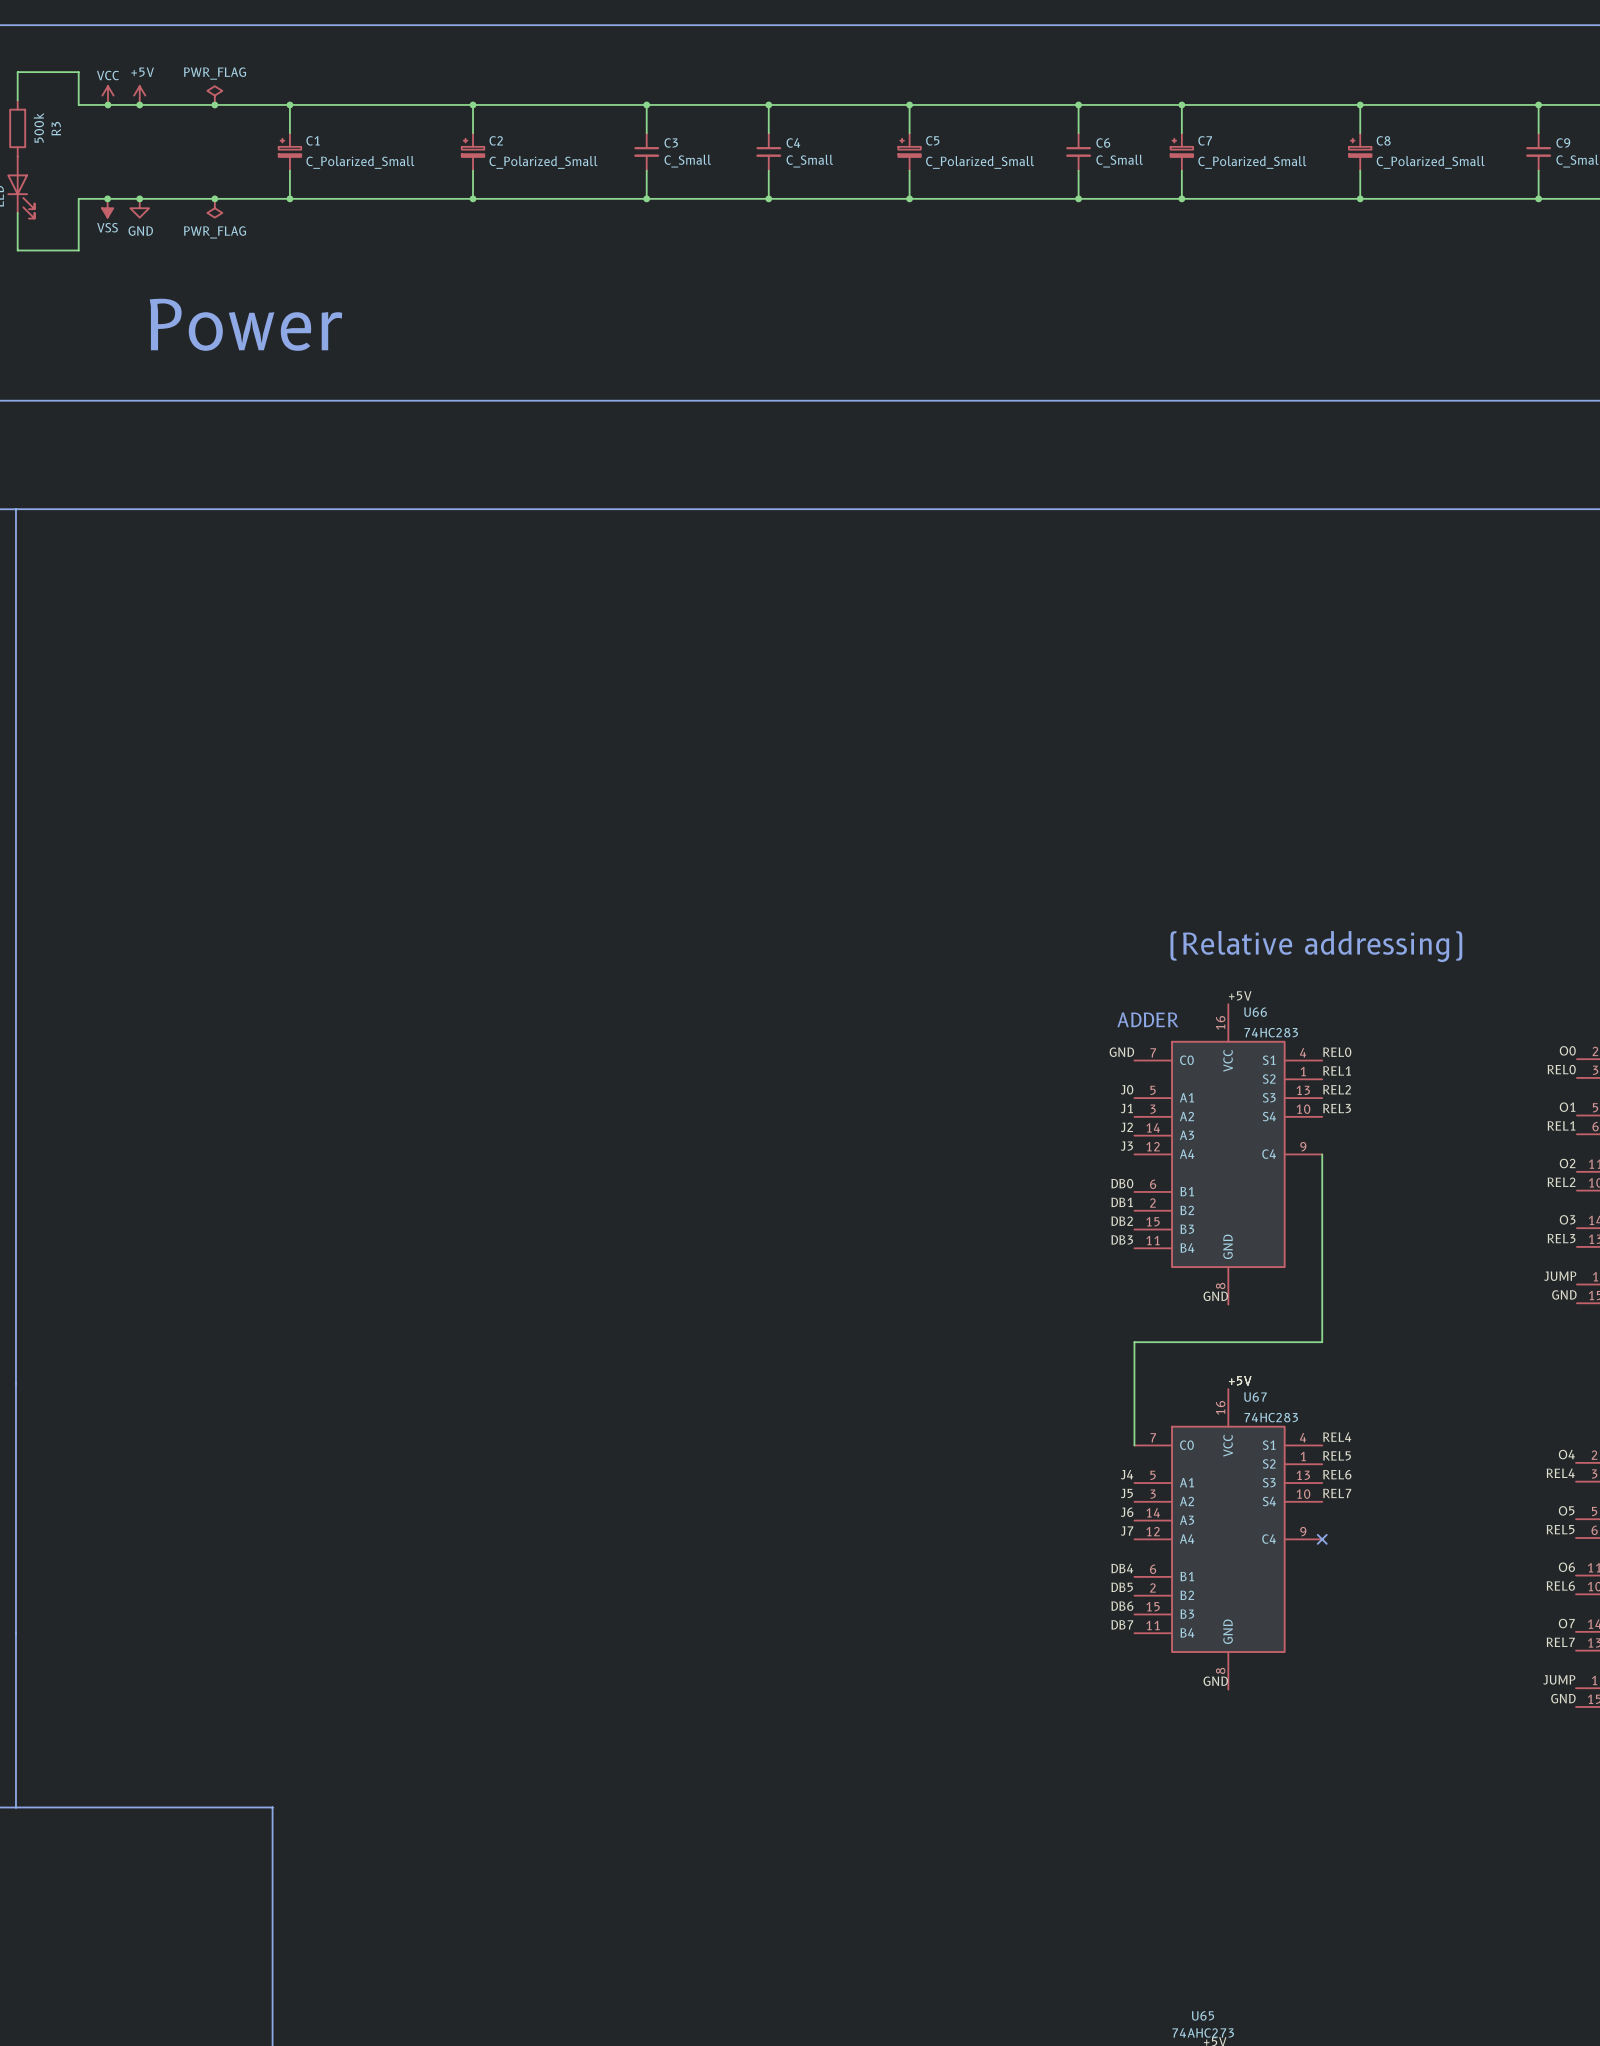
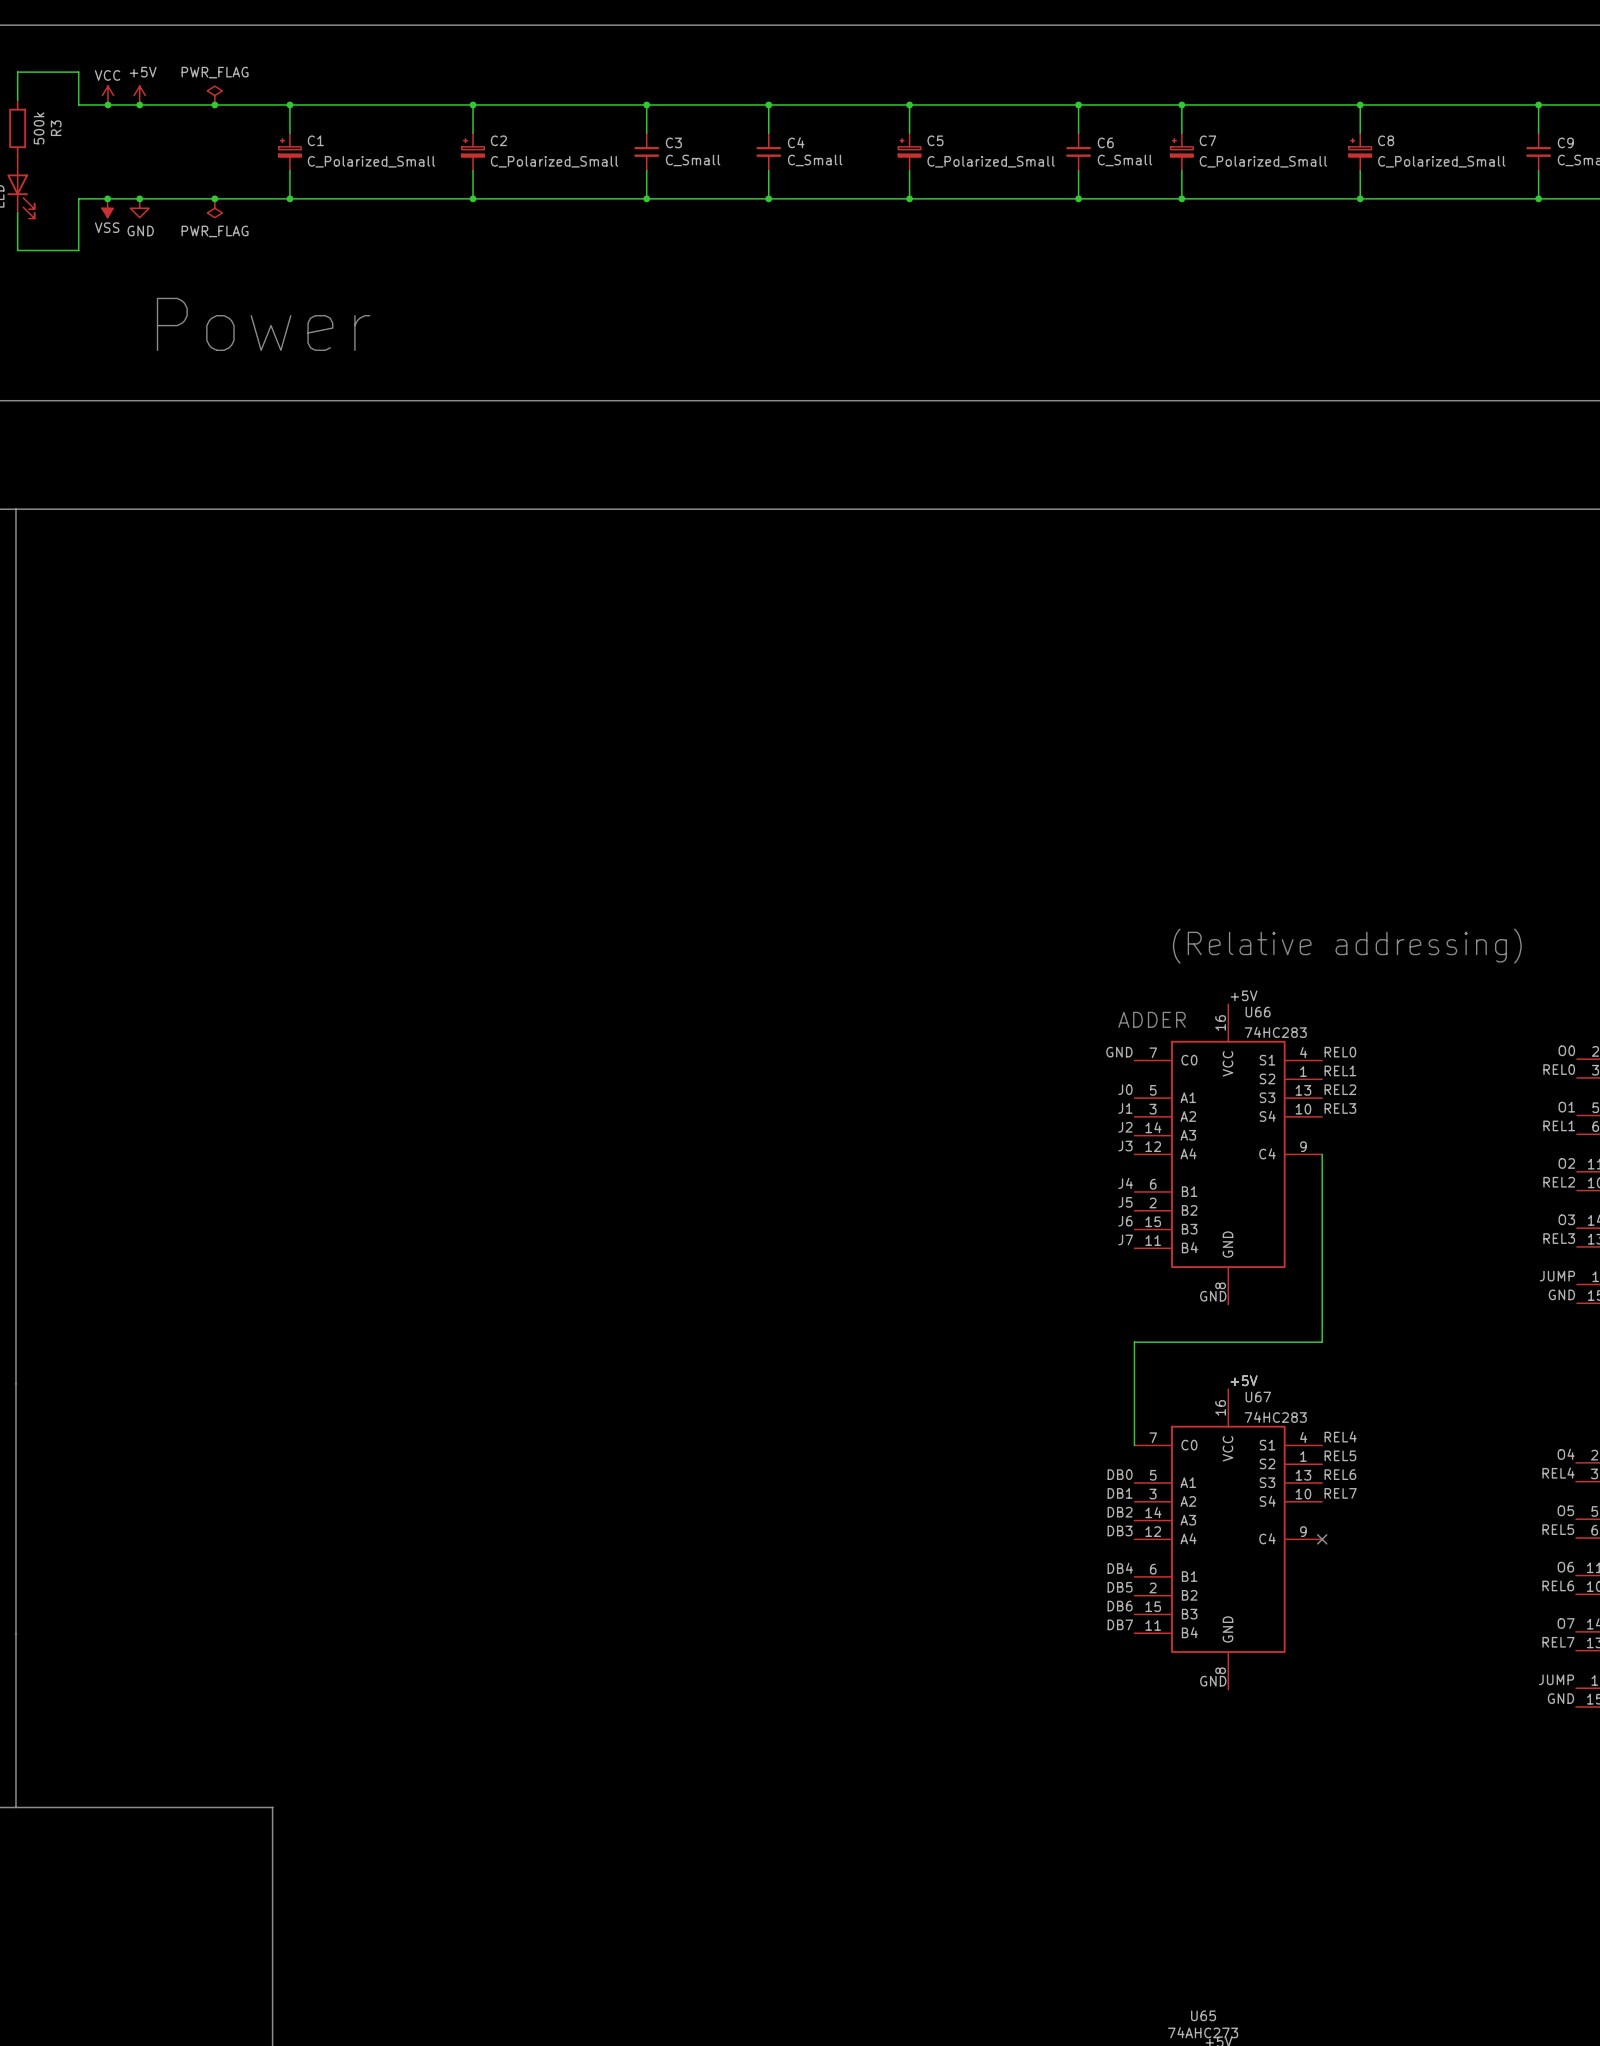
label: DB0 (1122, 1183) -> J4 (1125, 1183)
label: DB1 (1122, 1202) -> J5 (1125, 1202)
label: DB2 (1122, 1221) -> J6 (1125, 1221)
label: DB3 (1122, 1239) -> J7 (1125, 1239)
label: J4 (1127, 1474) -> DB0 (1120, 1474)
label: J5 (1126, 1493) -> DB1 (1120, 1493)
label: J6 (1127, 1512) -> DB2 (1120, 1512)
label: J7 (1127, 1531) -> DB3 (1120, 1530)

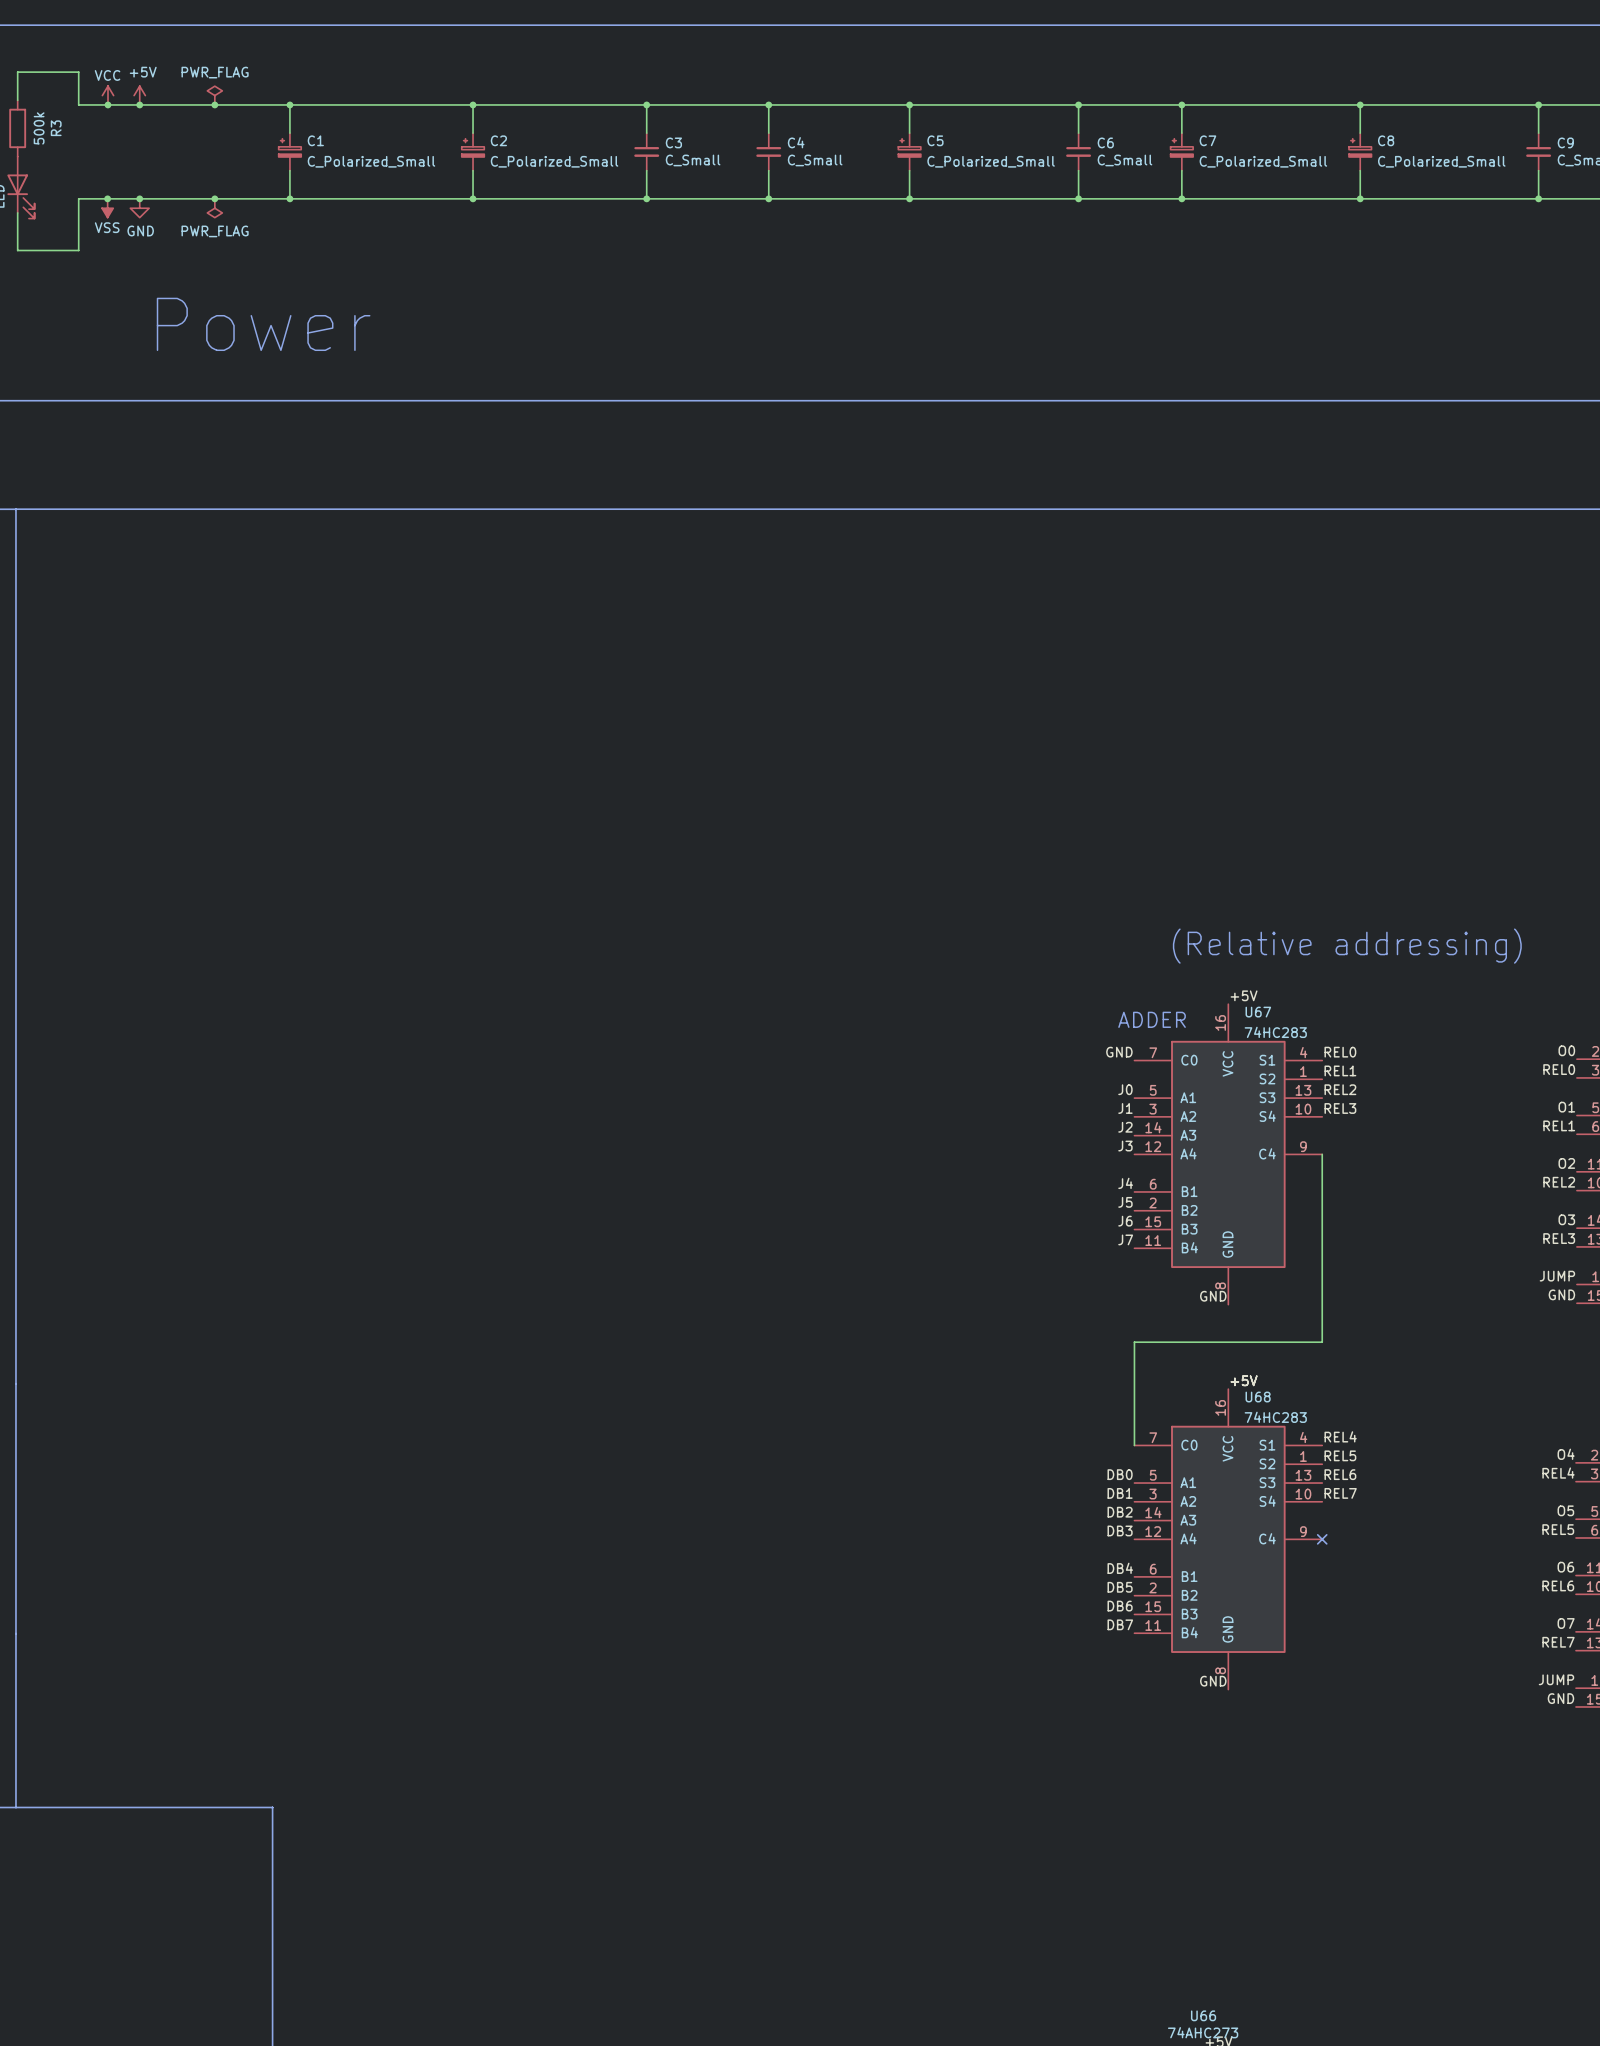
U66 name: U66 (1258, 1012) -> U67 (1258, 1012)
U67 name: U67 (1258, 1397) -> U68 (1258, 1397)
U65 name: U65 (1203, 2015) -> U66 (1203, 2015)

